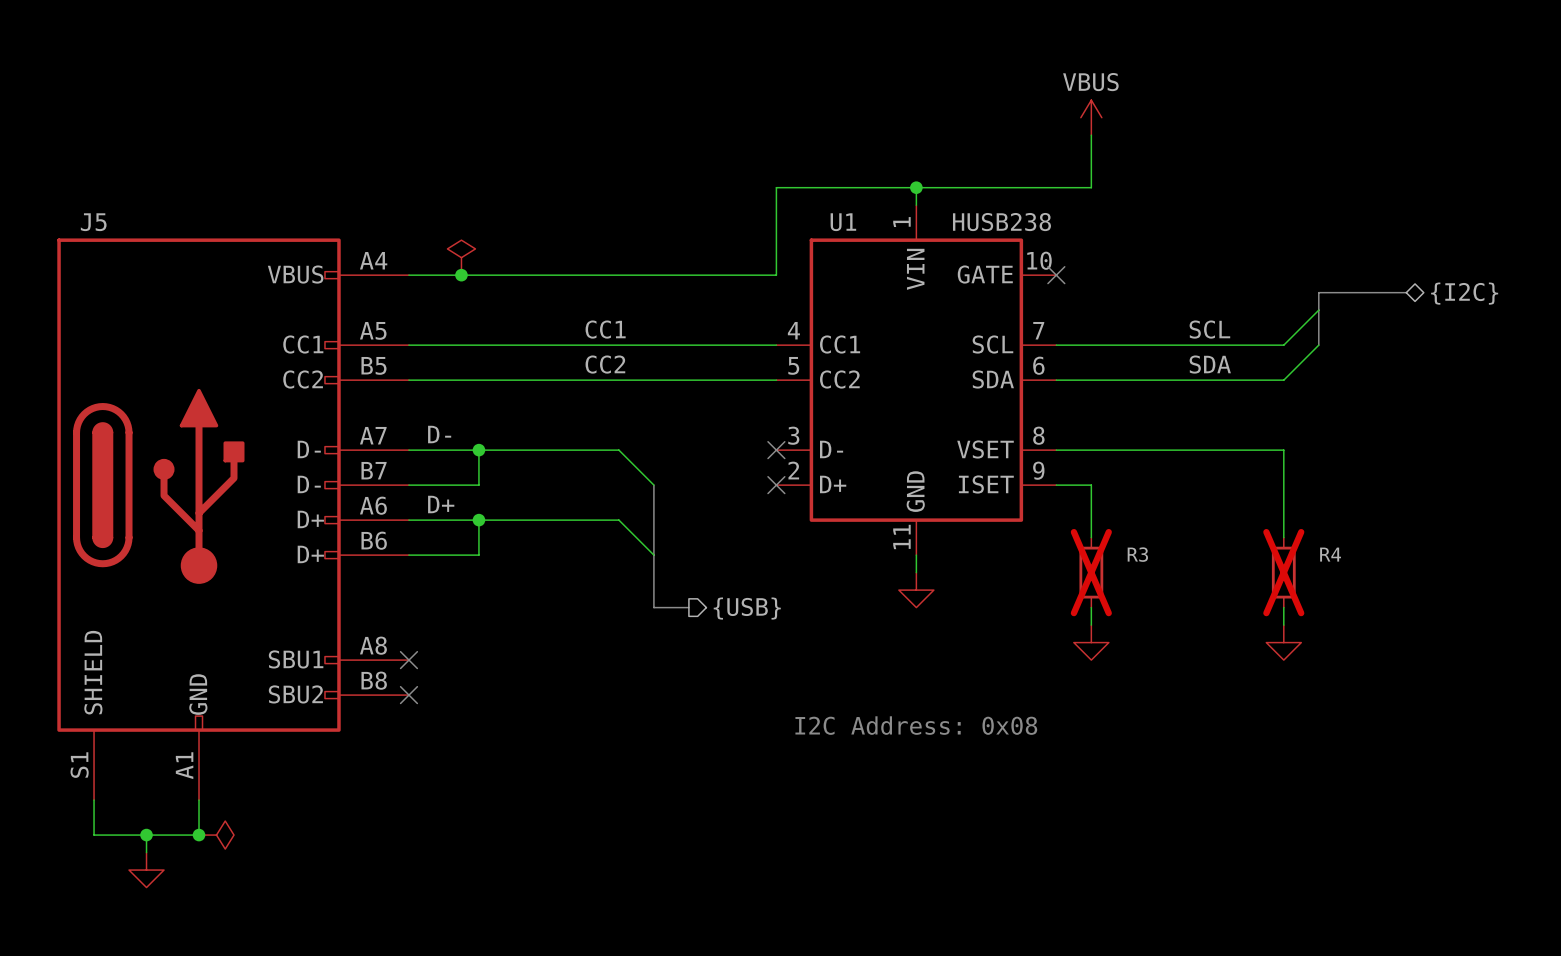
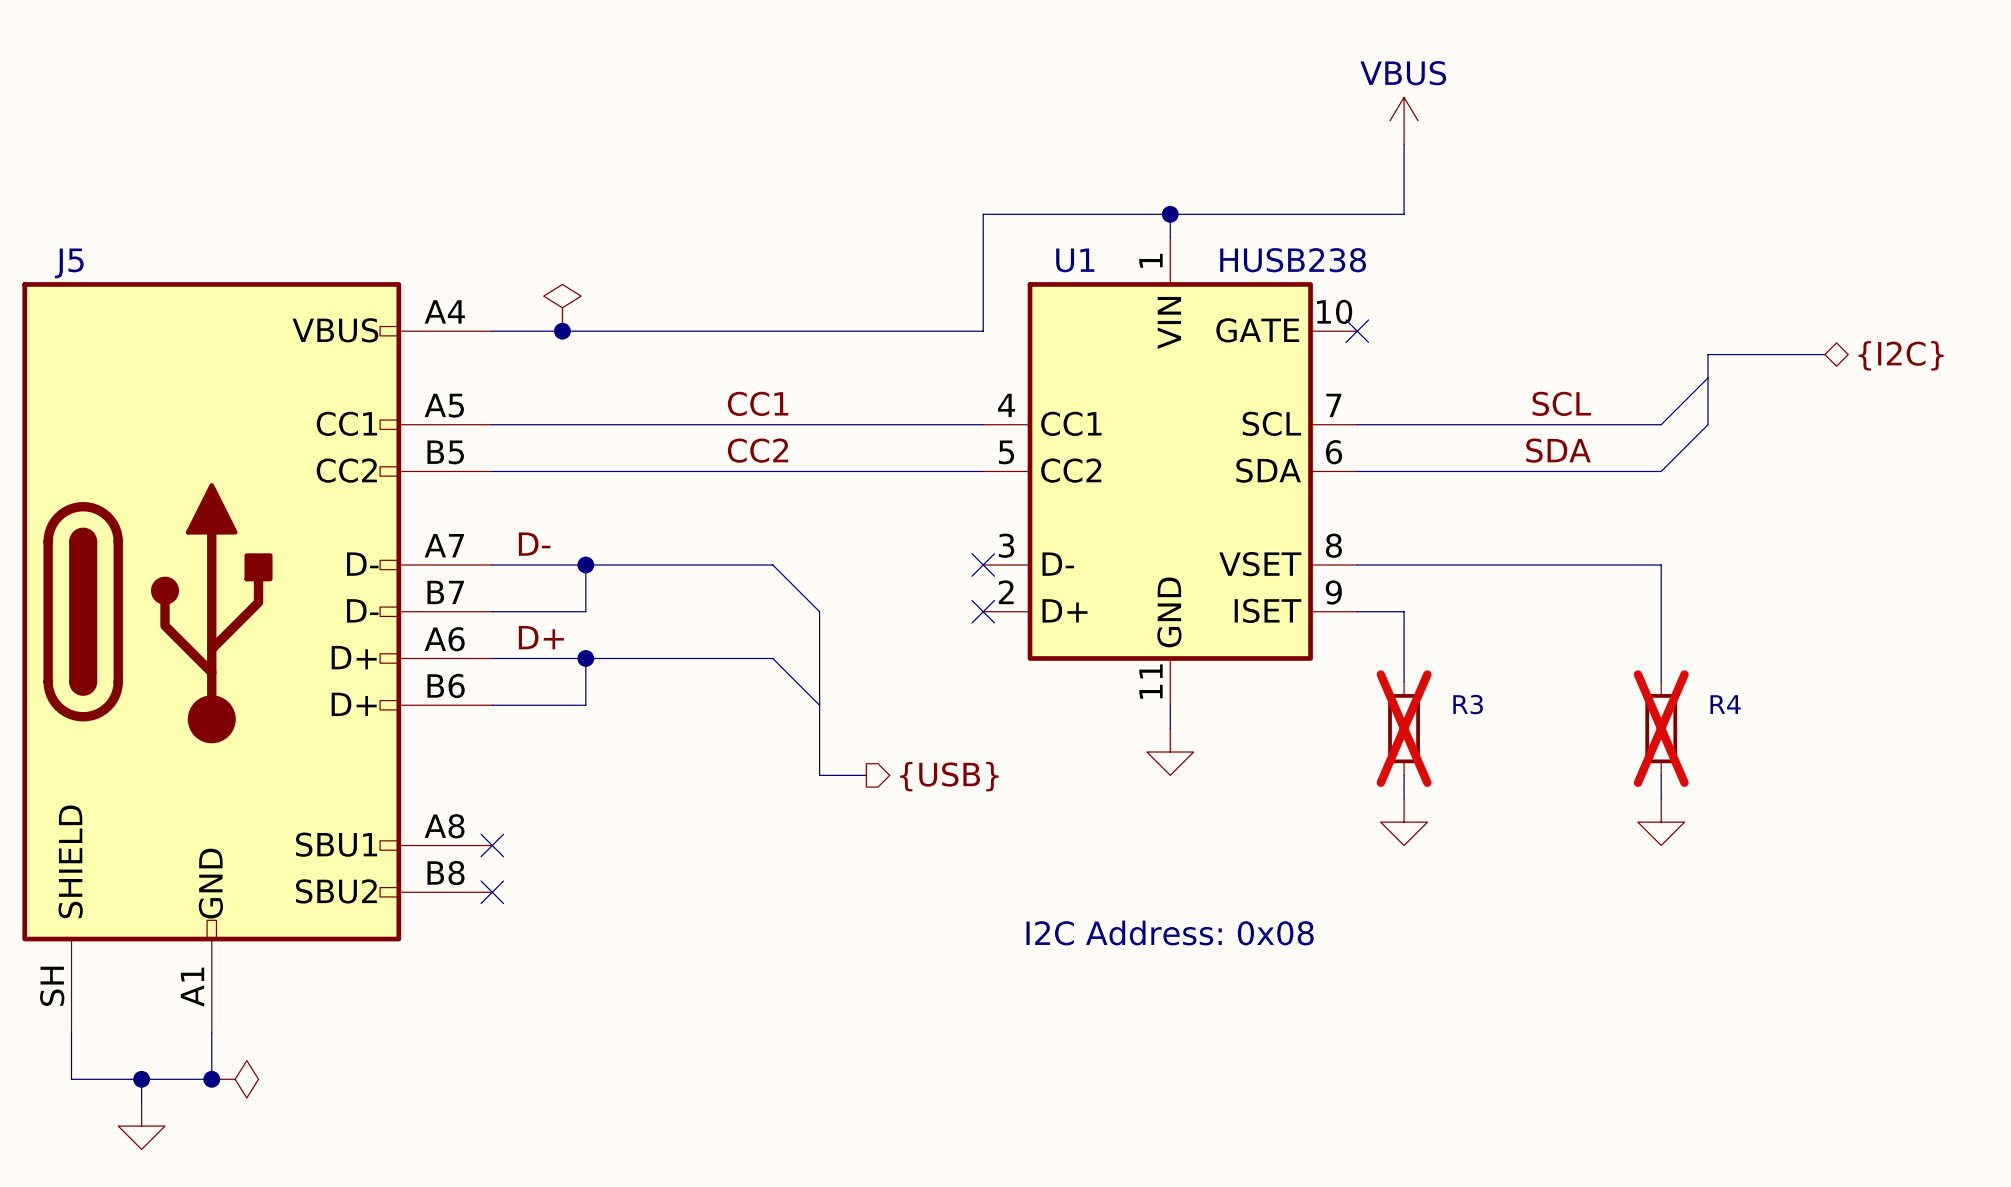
J5 pin number: S1 (79, 765) -> SH (52, 986)

